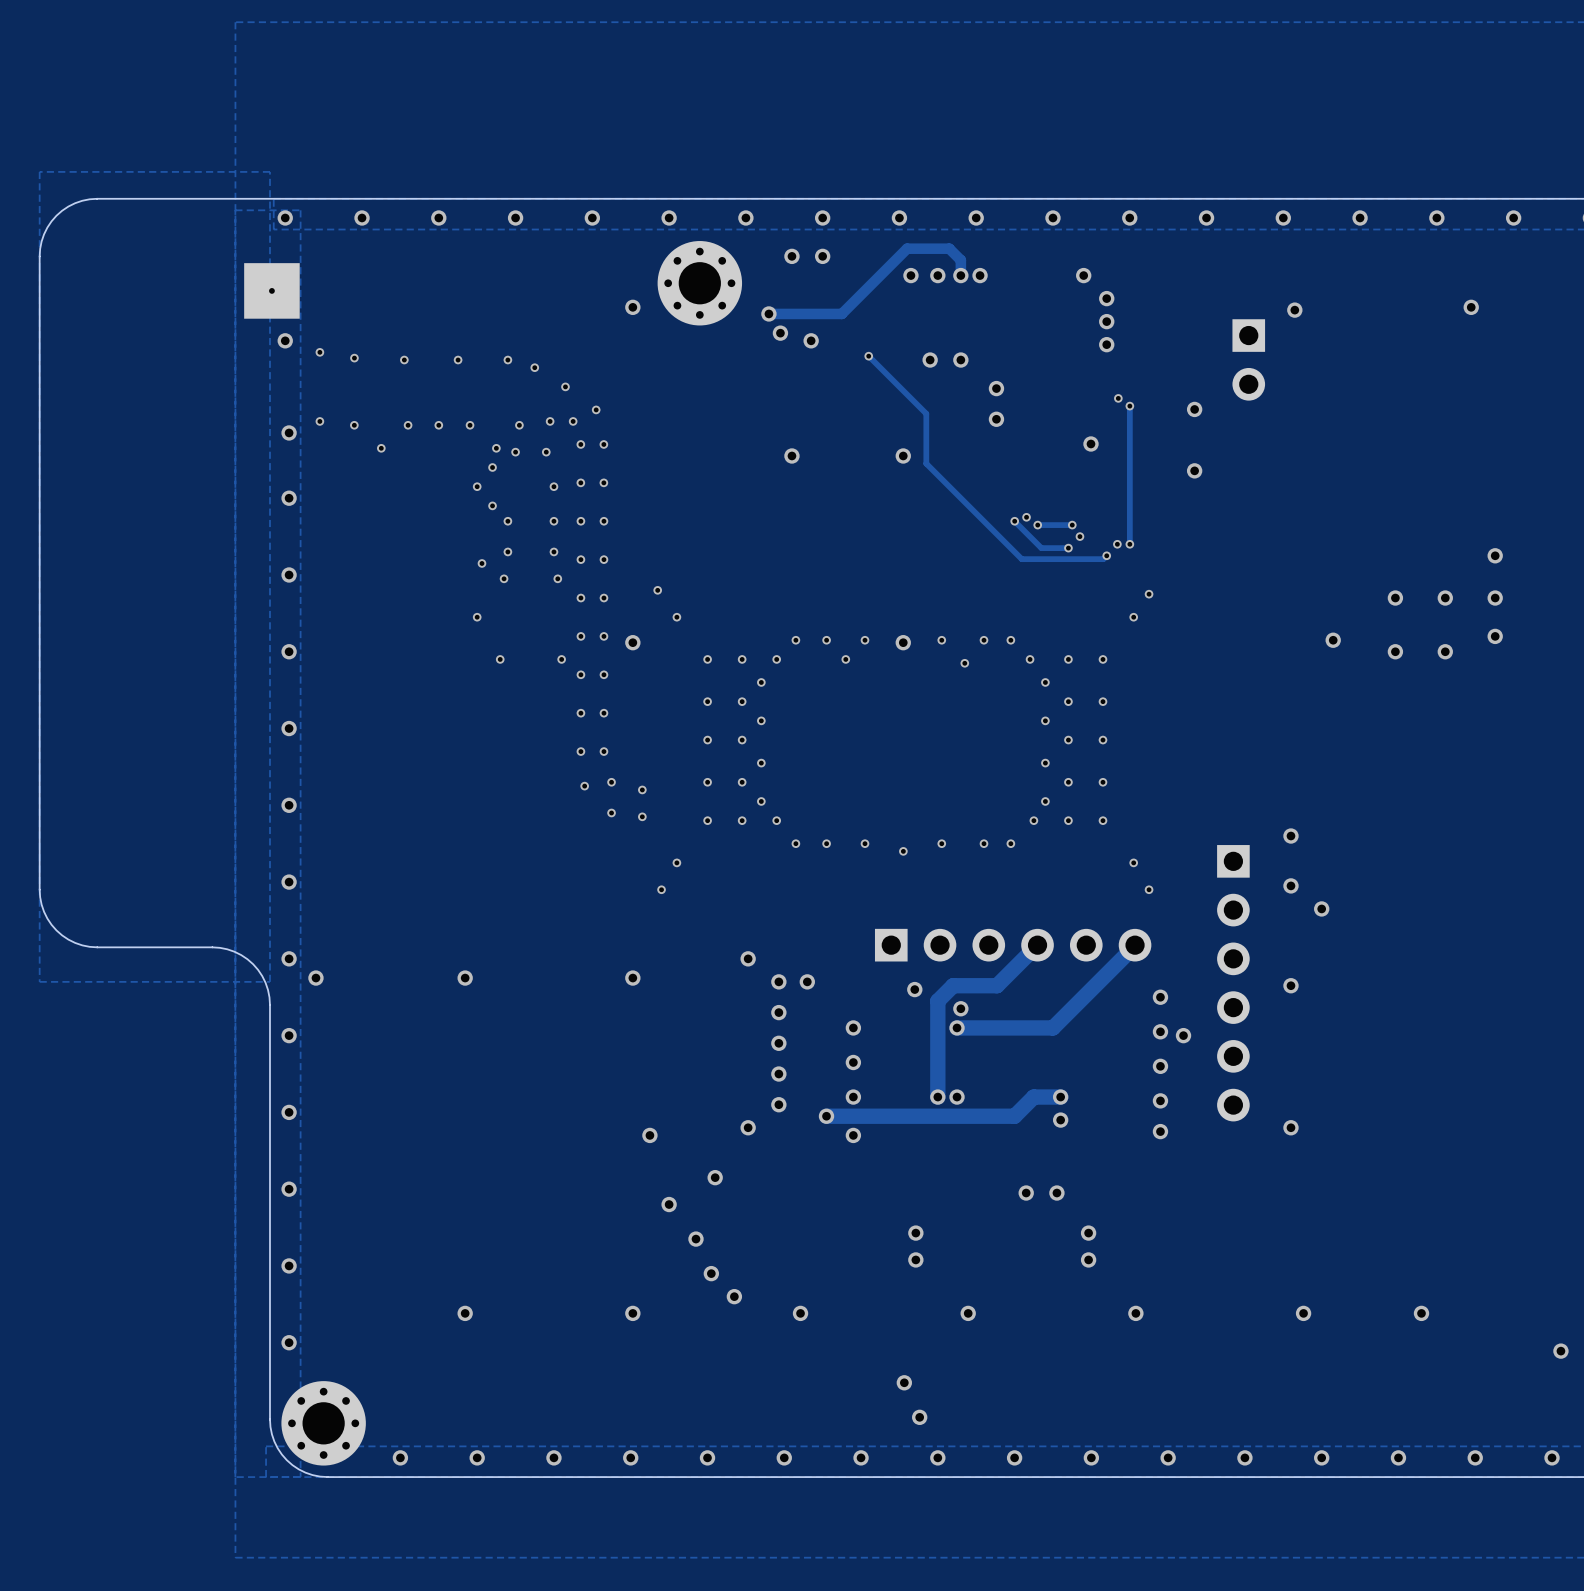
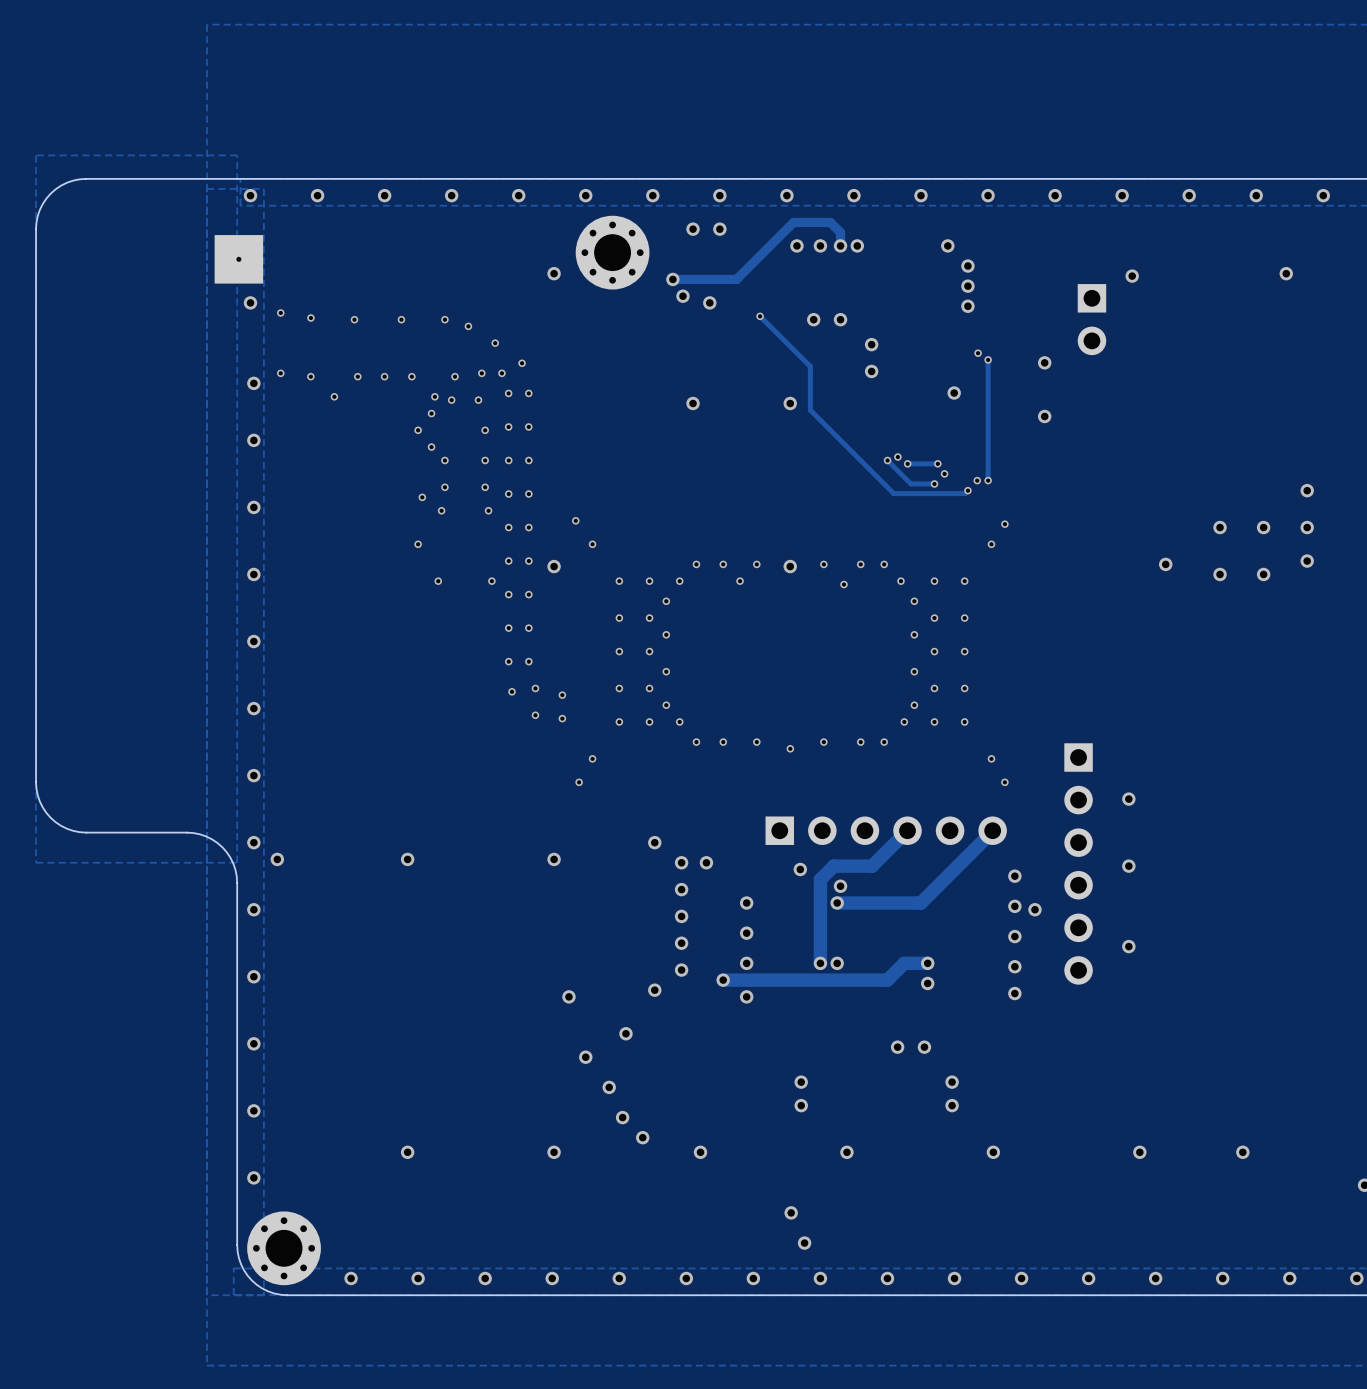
via: (1290, 836) -> none
via: (1290, 885) -> none
via: none -> (1128, 799)
via: (1321, 908) -> none
via position: (1290, 1127) -> (1128, 946)

